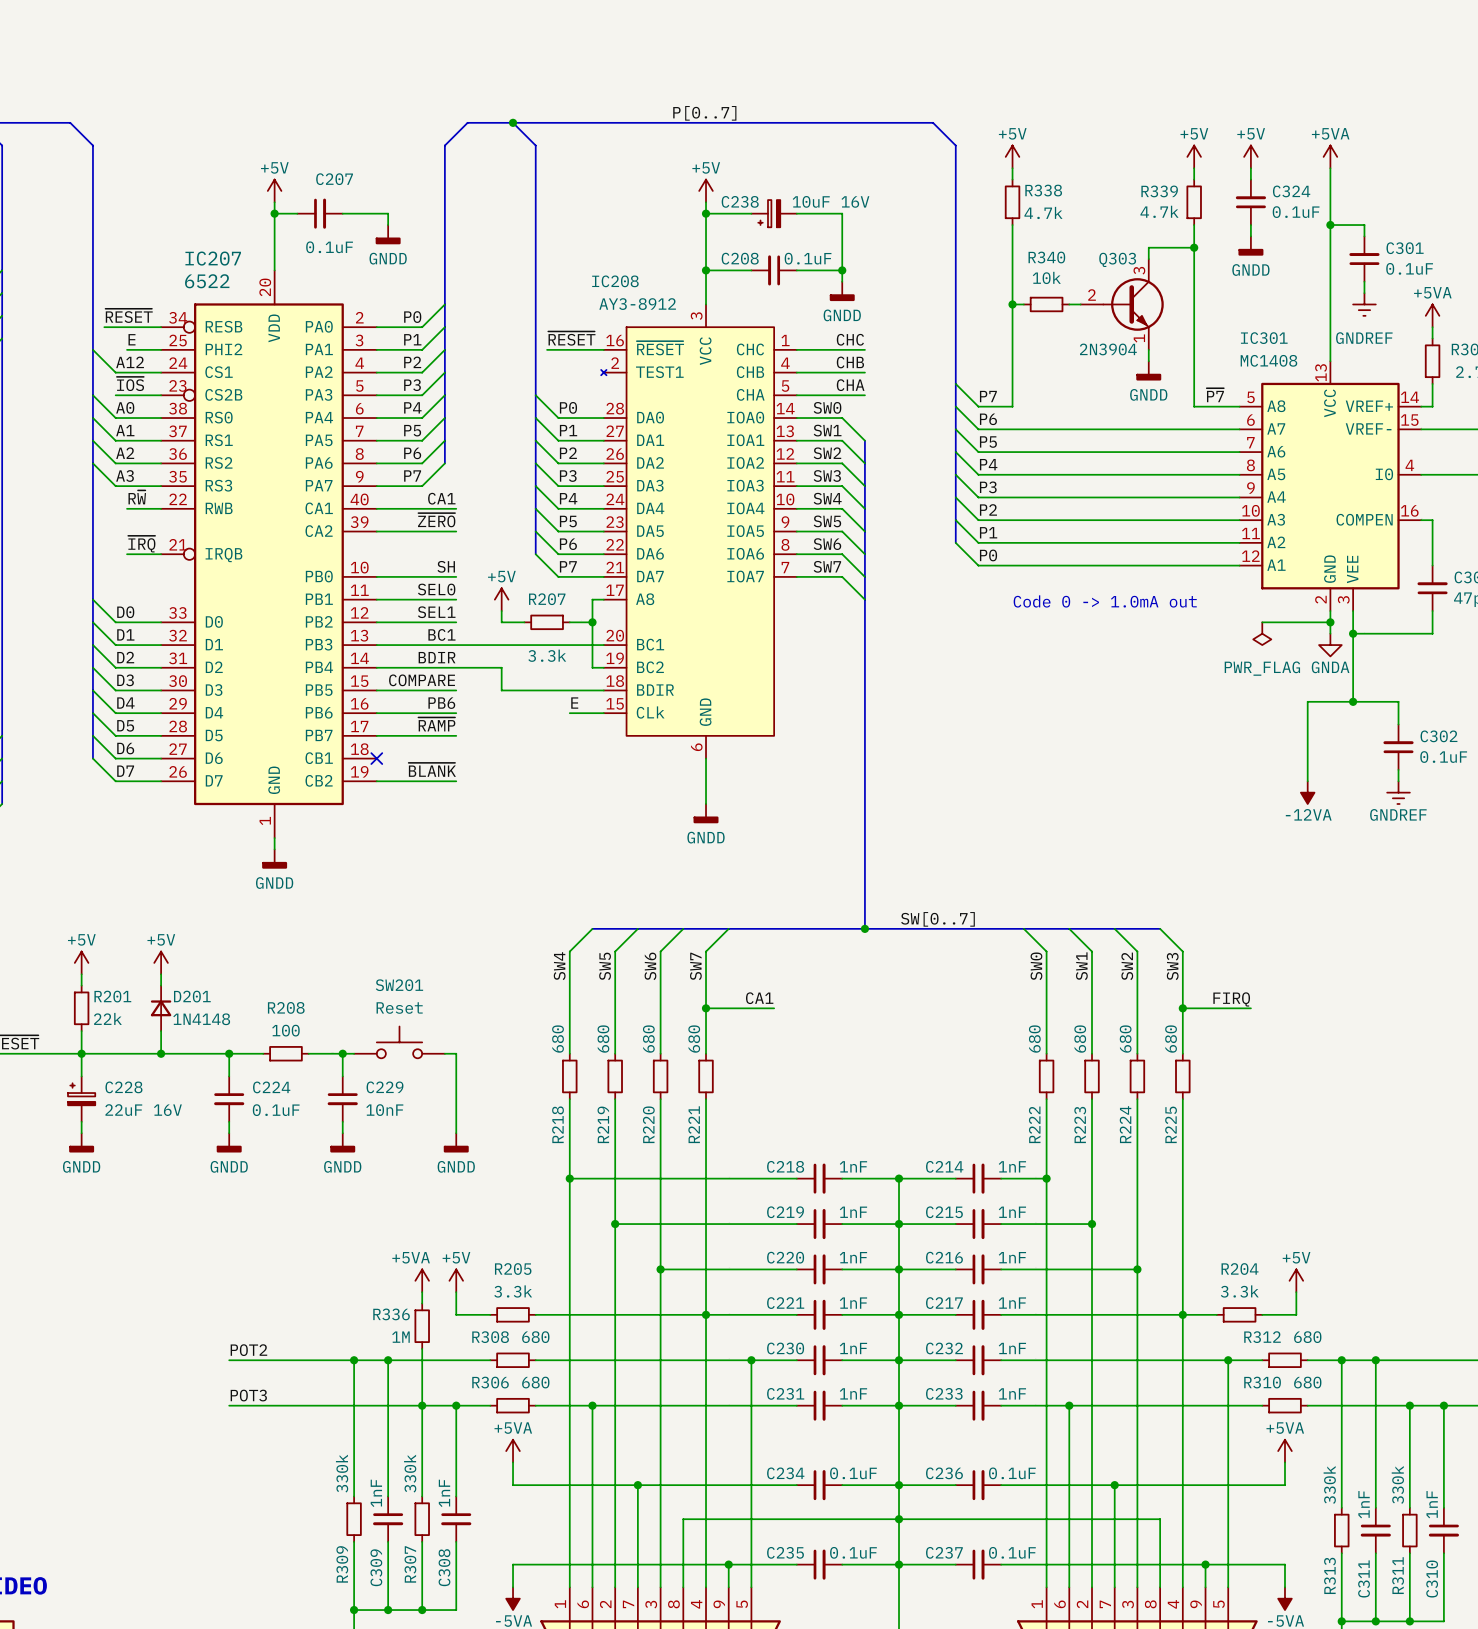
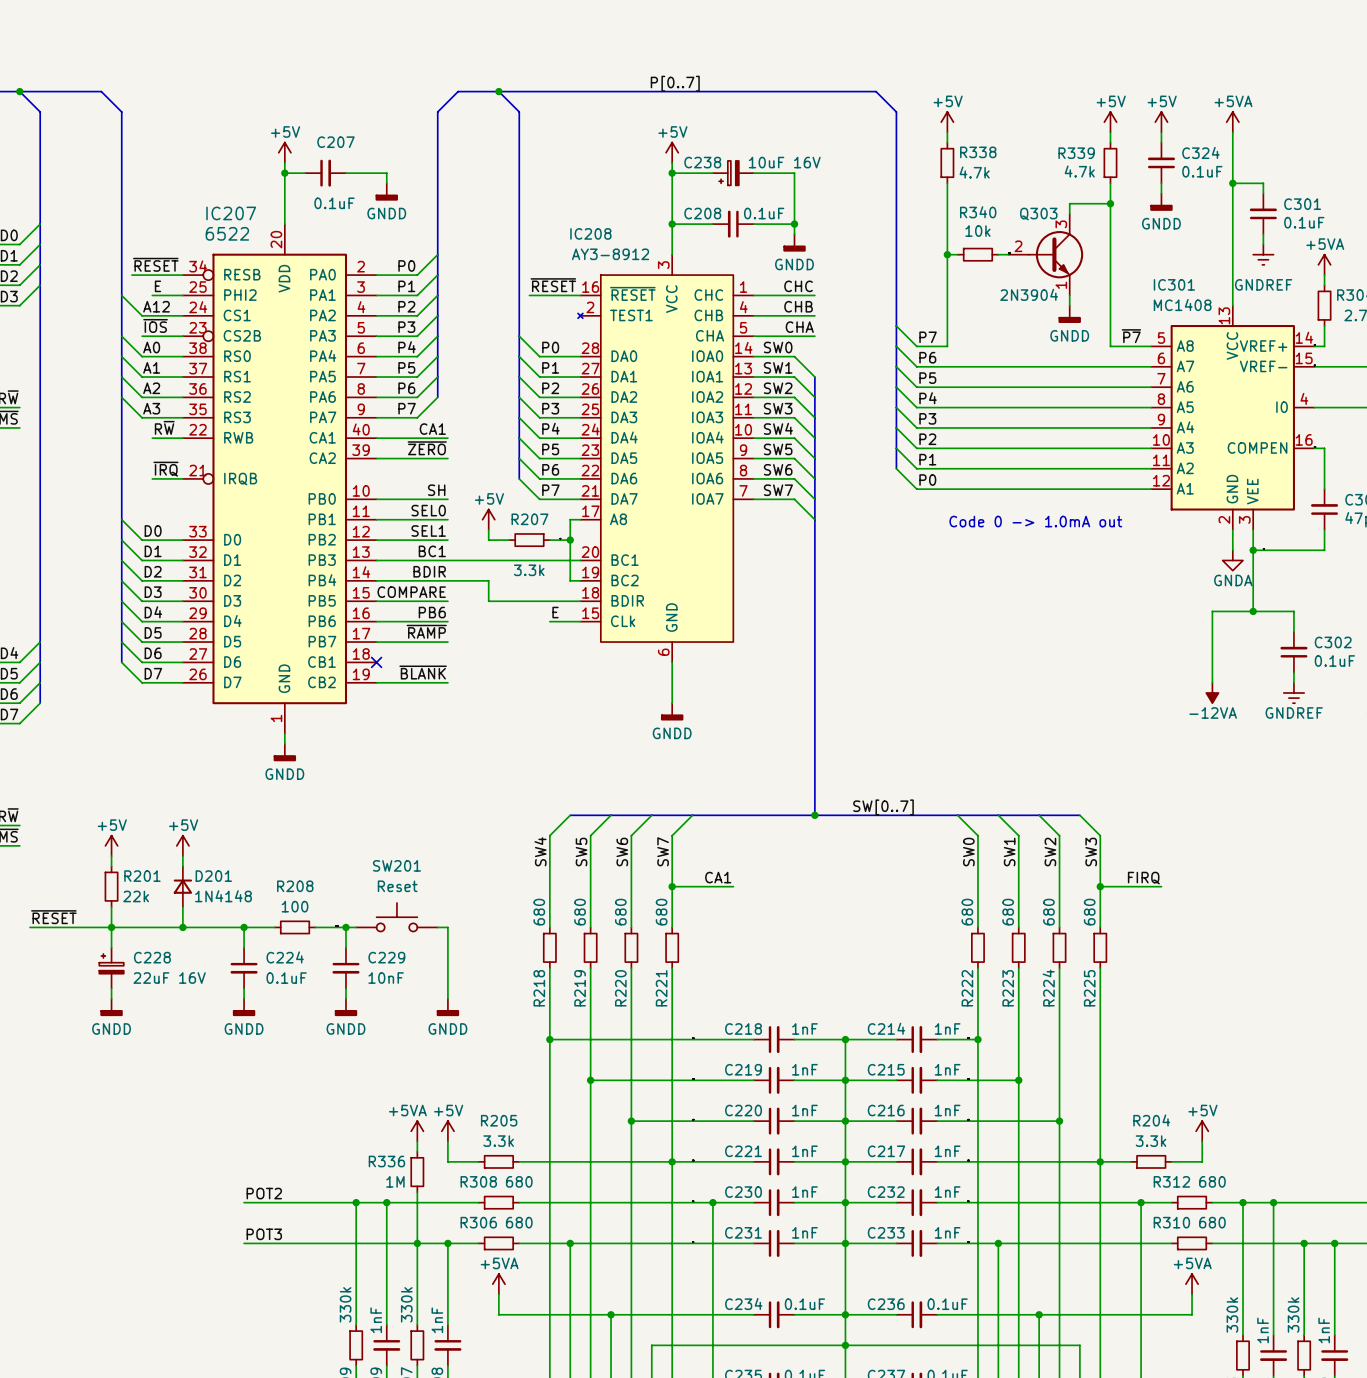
wire: (1262, 622) (1330, 622) -> none
junction: (1330, 622) -> none
power symbol: PWR_FLAG (1262, 633) -> none

